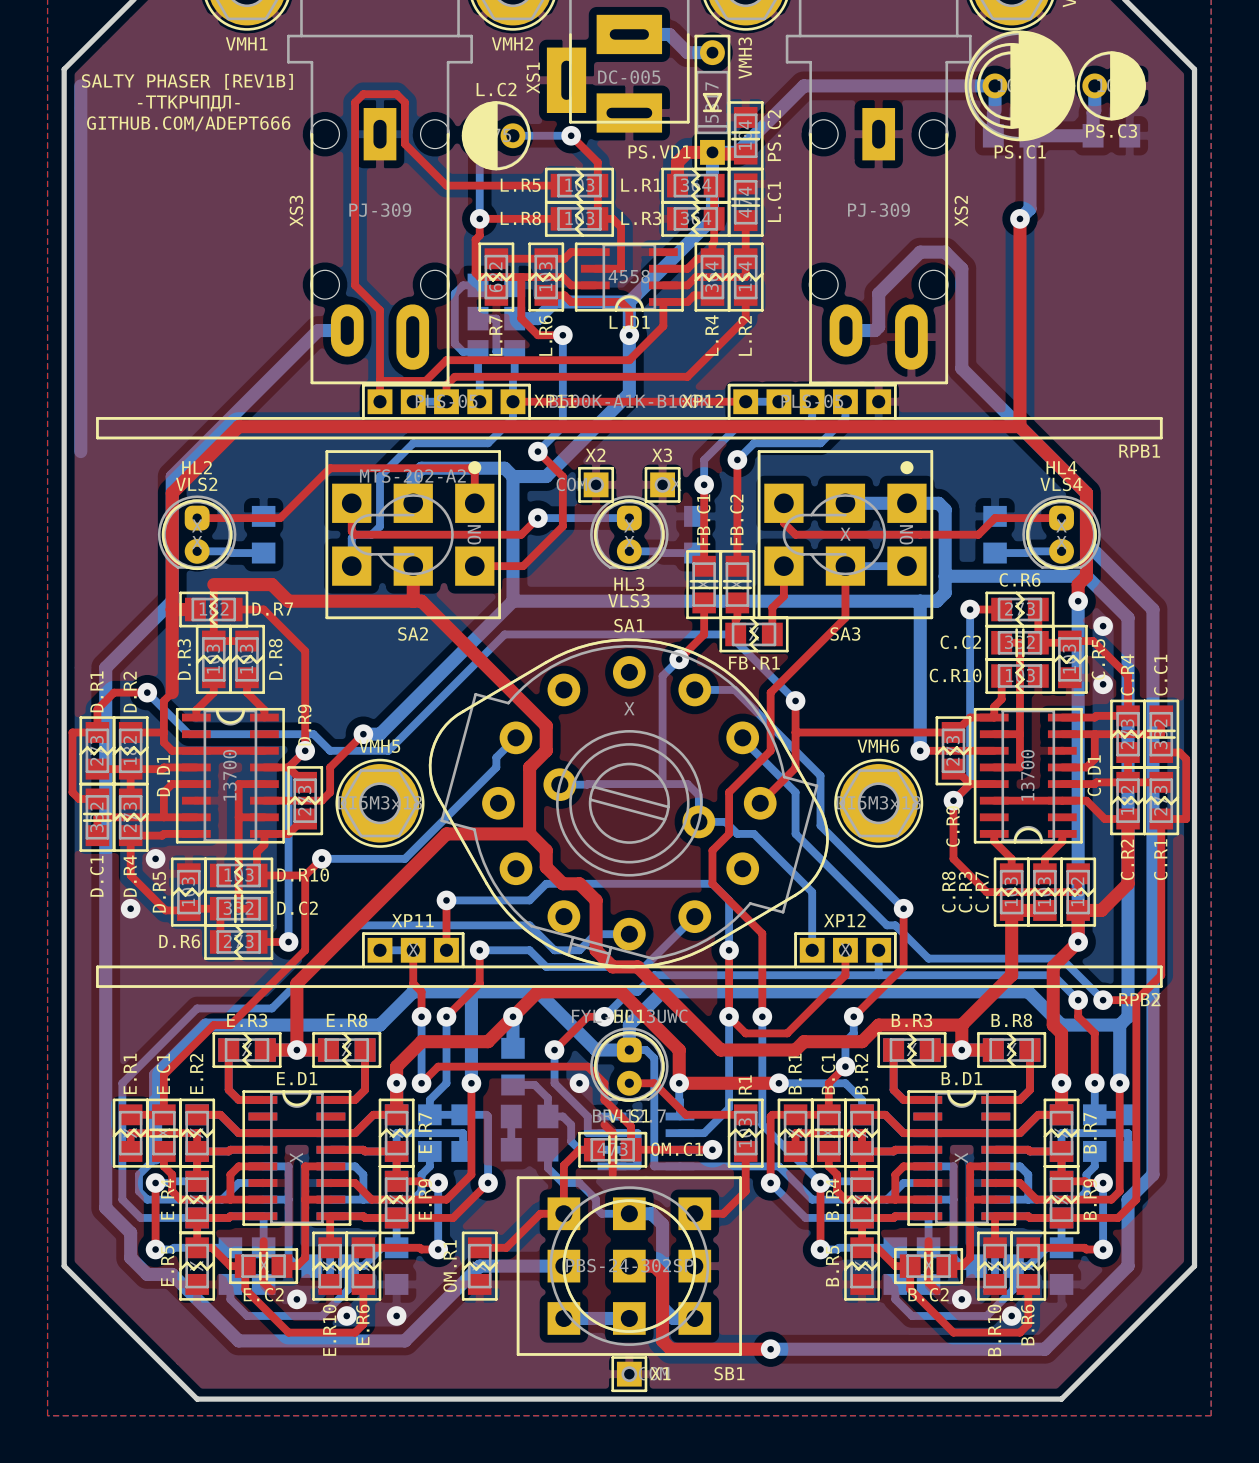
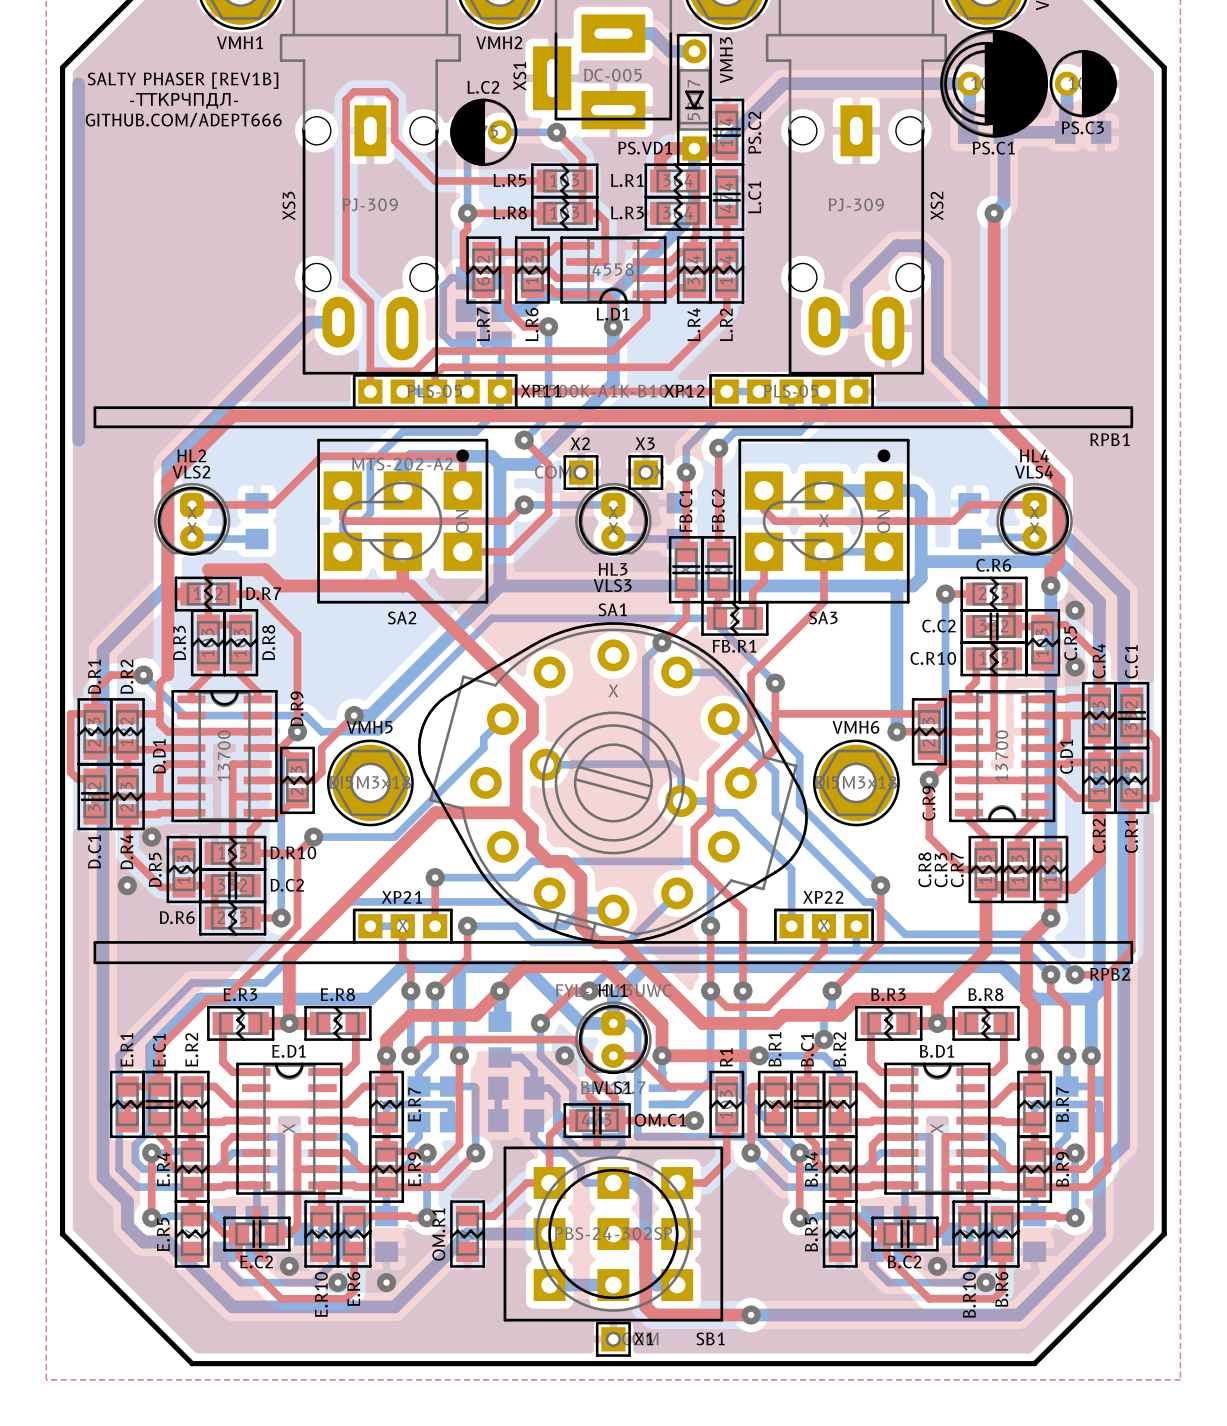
RPB2 footprint: [96, 932, 1163, 988] -> [93, 908, 1134, 965]
bottom track: none -> (556, 1112) (556, 1128) (580, 1153) (613, 1153) (621, 1144) (621, 1136)

